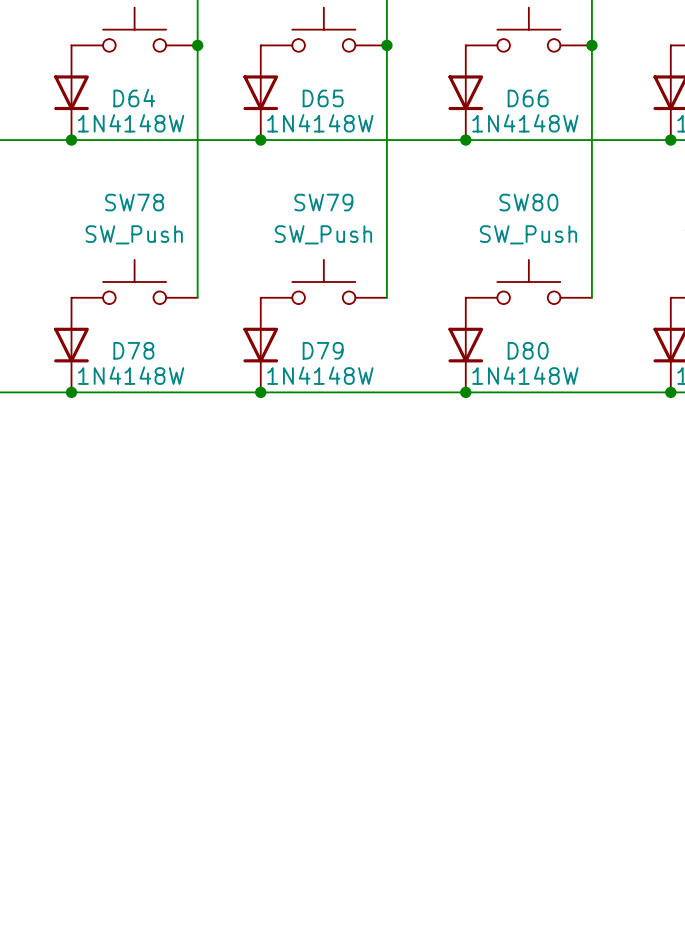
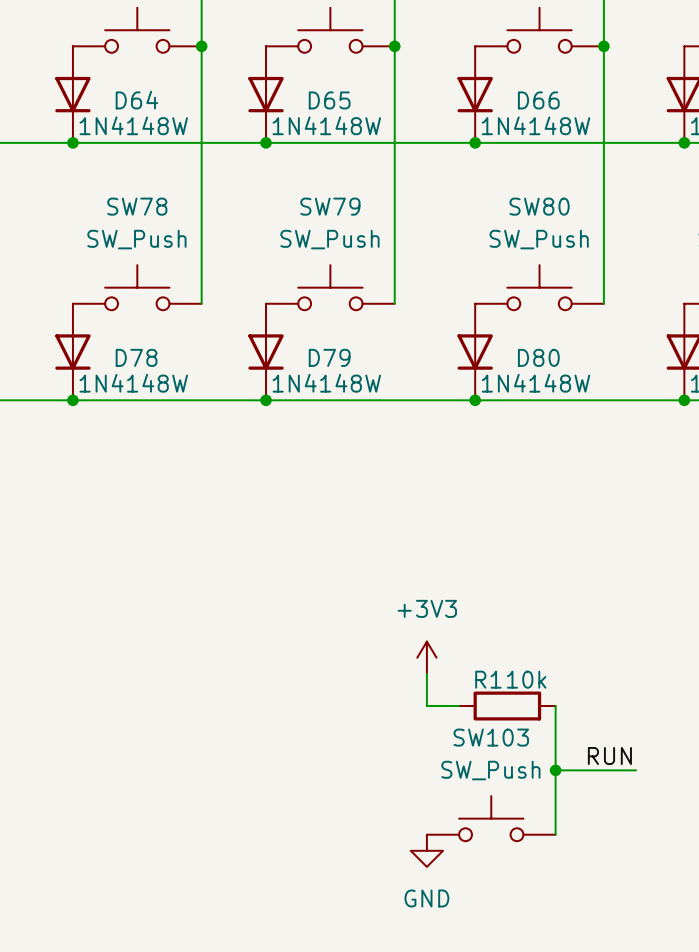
power symbol: none -> +3V3 (426, 657)
wire: none -> (426, 673) (426, 706) (459, 706)
R1: none -> 10k (507, 706)
wire: none -> (555, 706) (555, 834)
label: none -> RUN (609, 756)
wire: none -> (555, 770) (636, 770)
junction: none -> (555, 770)
SW103: none -> SW_Push (491, 818)
power symbol: none -> GND (426, 850)

